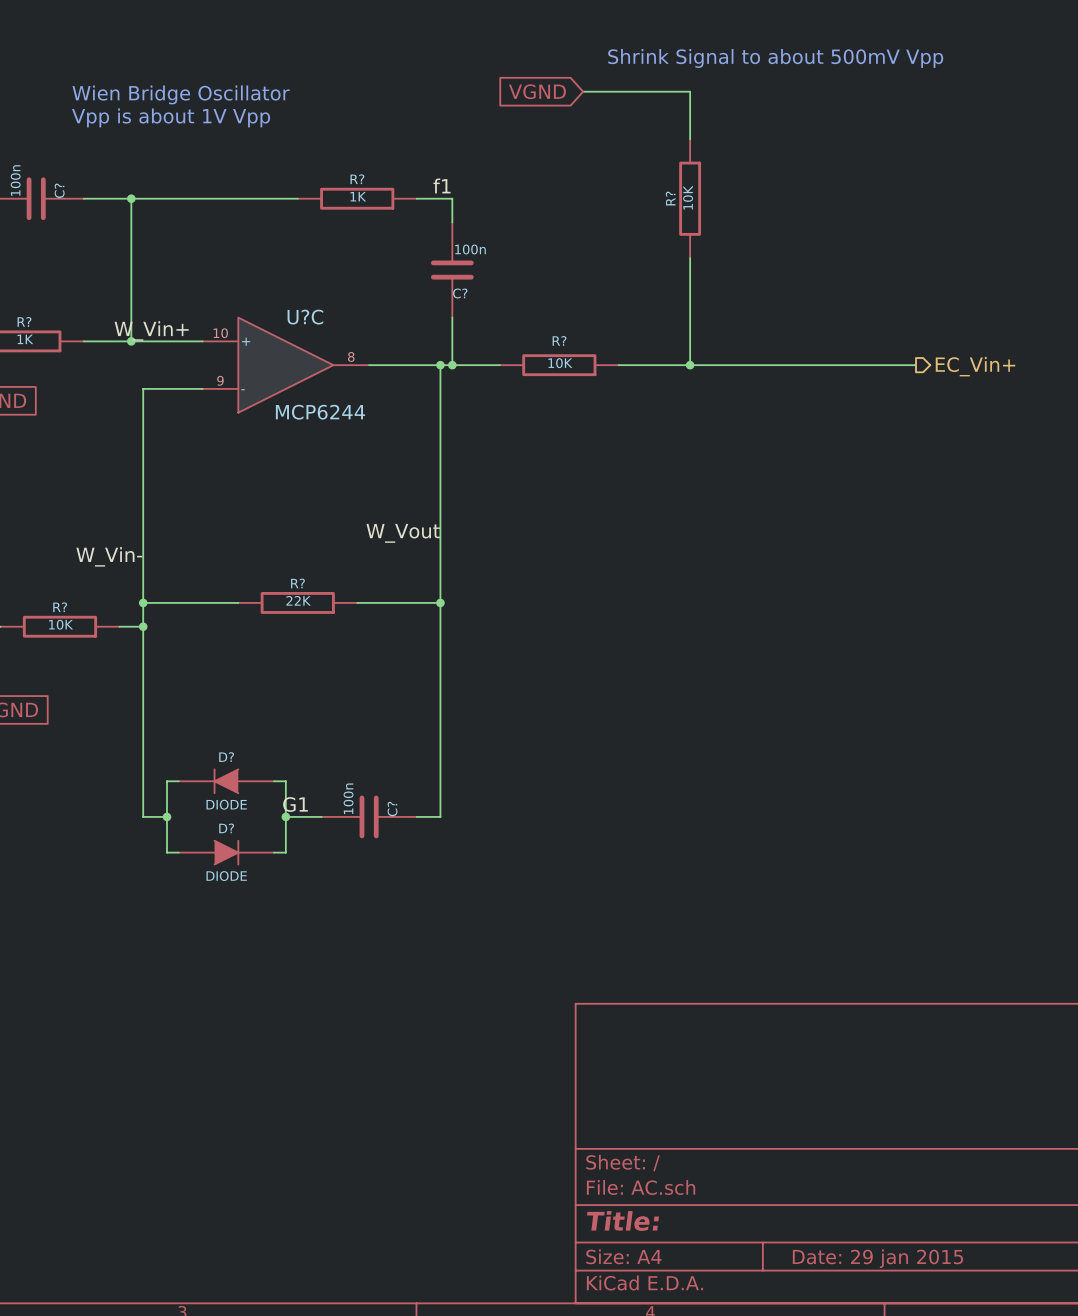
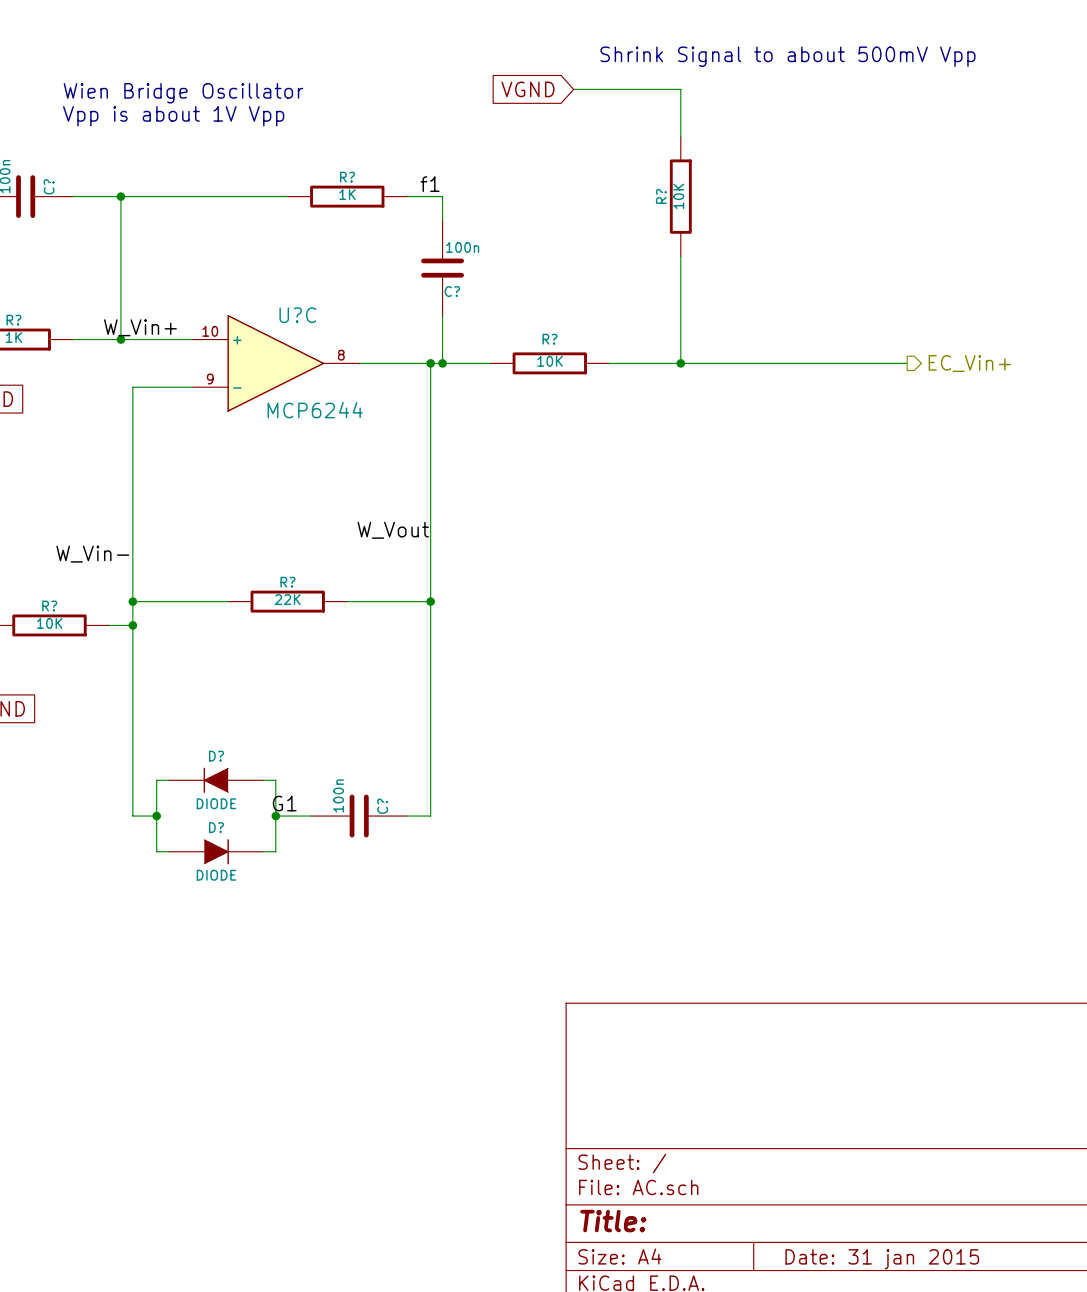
title block: Date: 29 jan 2015 (877, 1258) -> Date: 31 jan 2015 (882, 1259)

